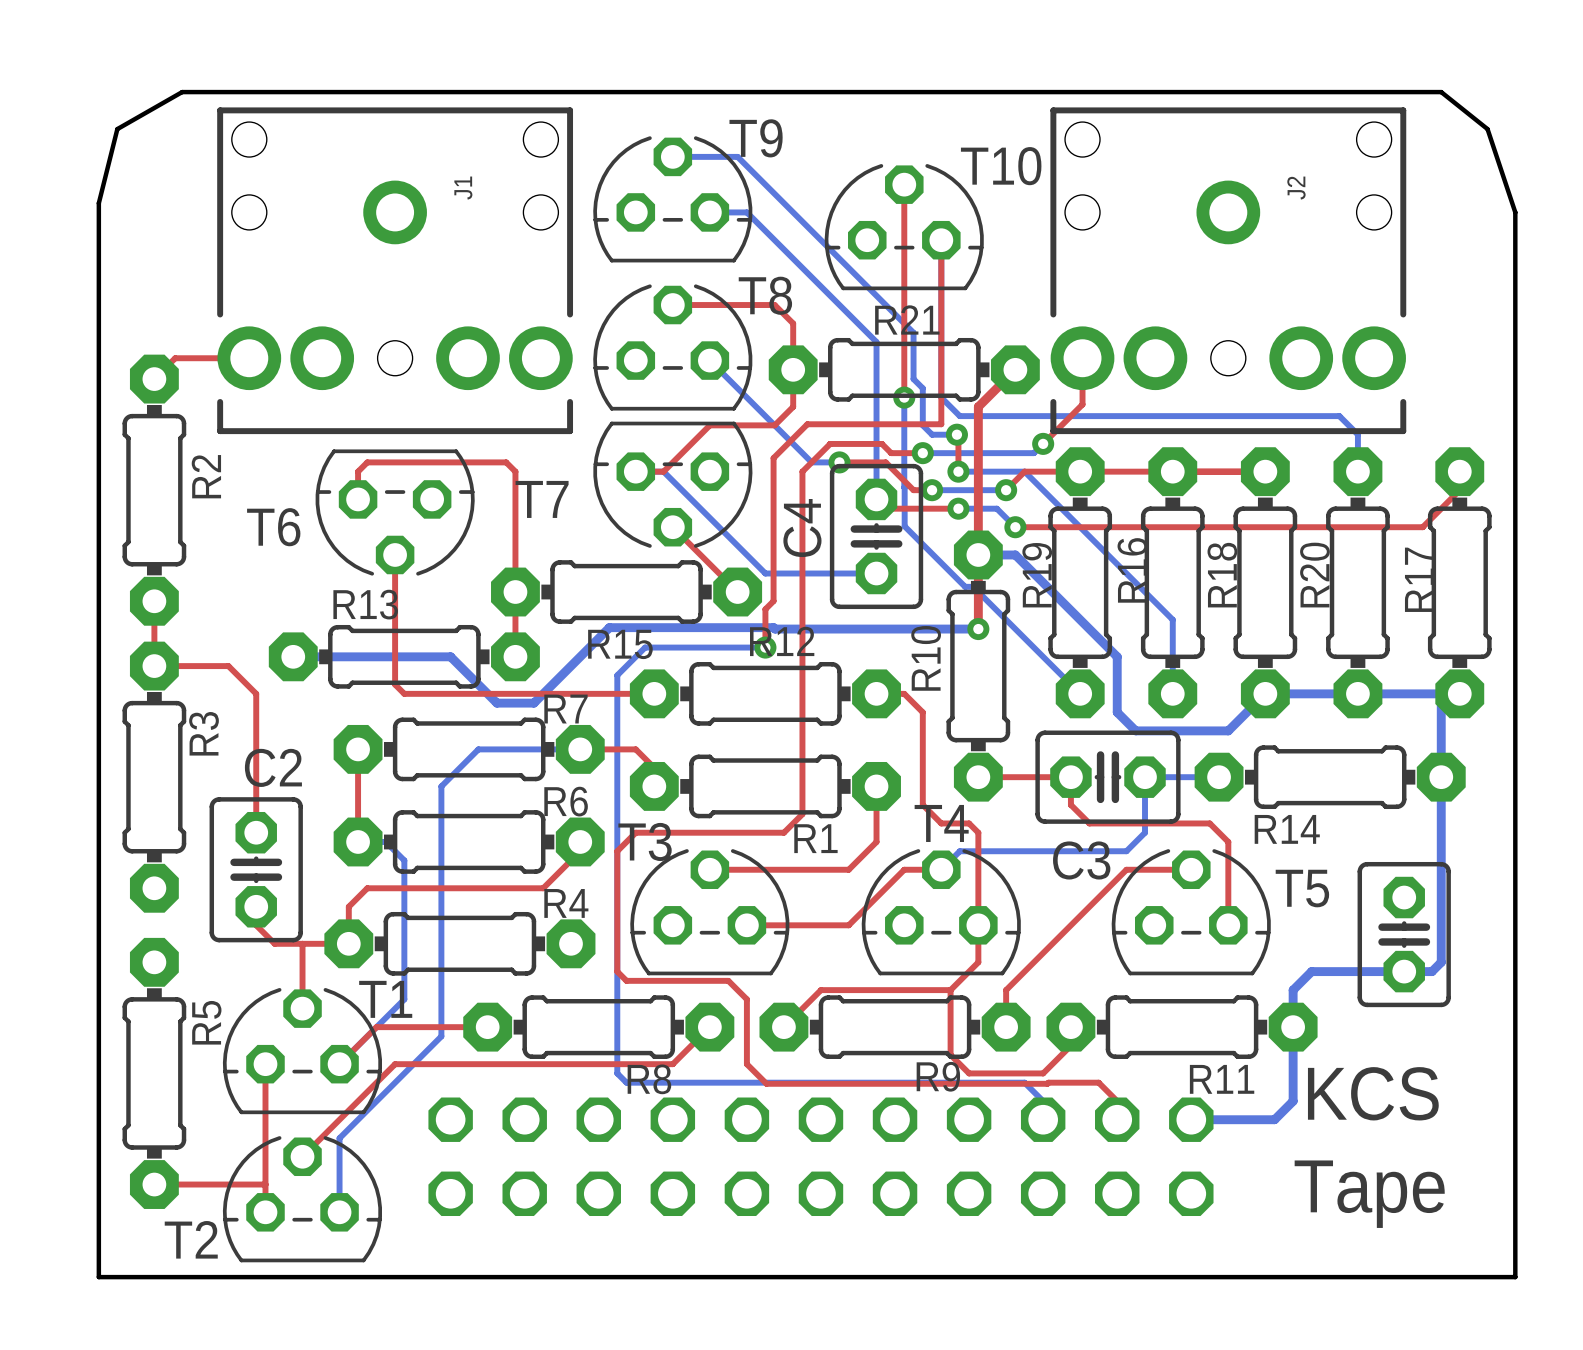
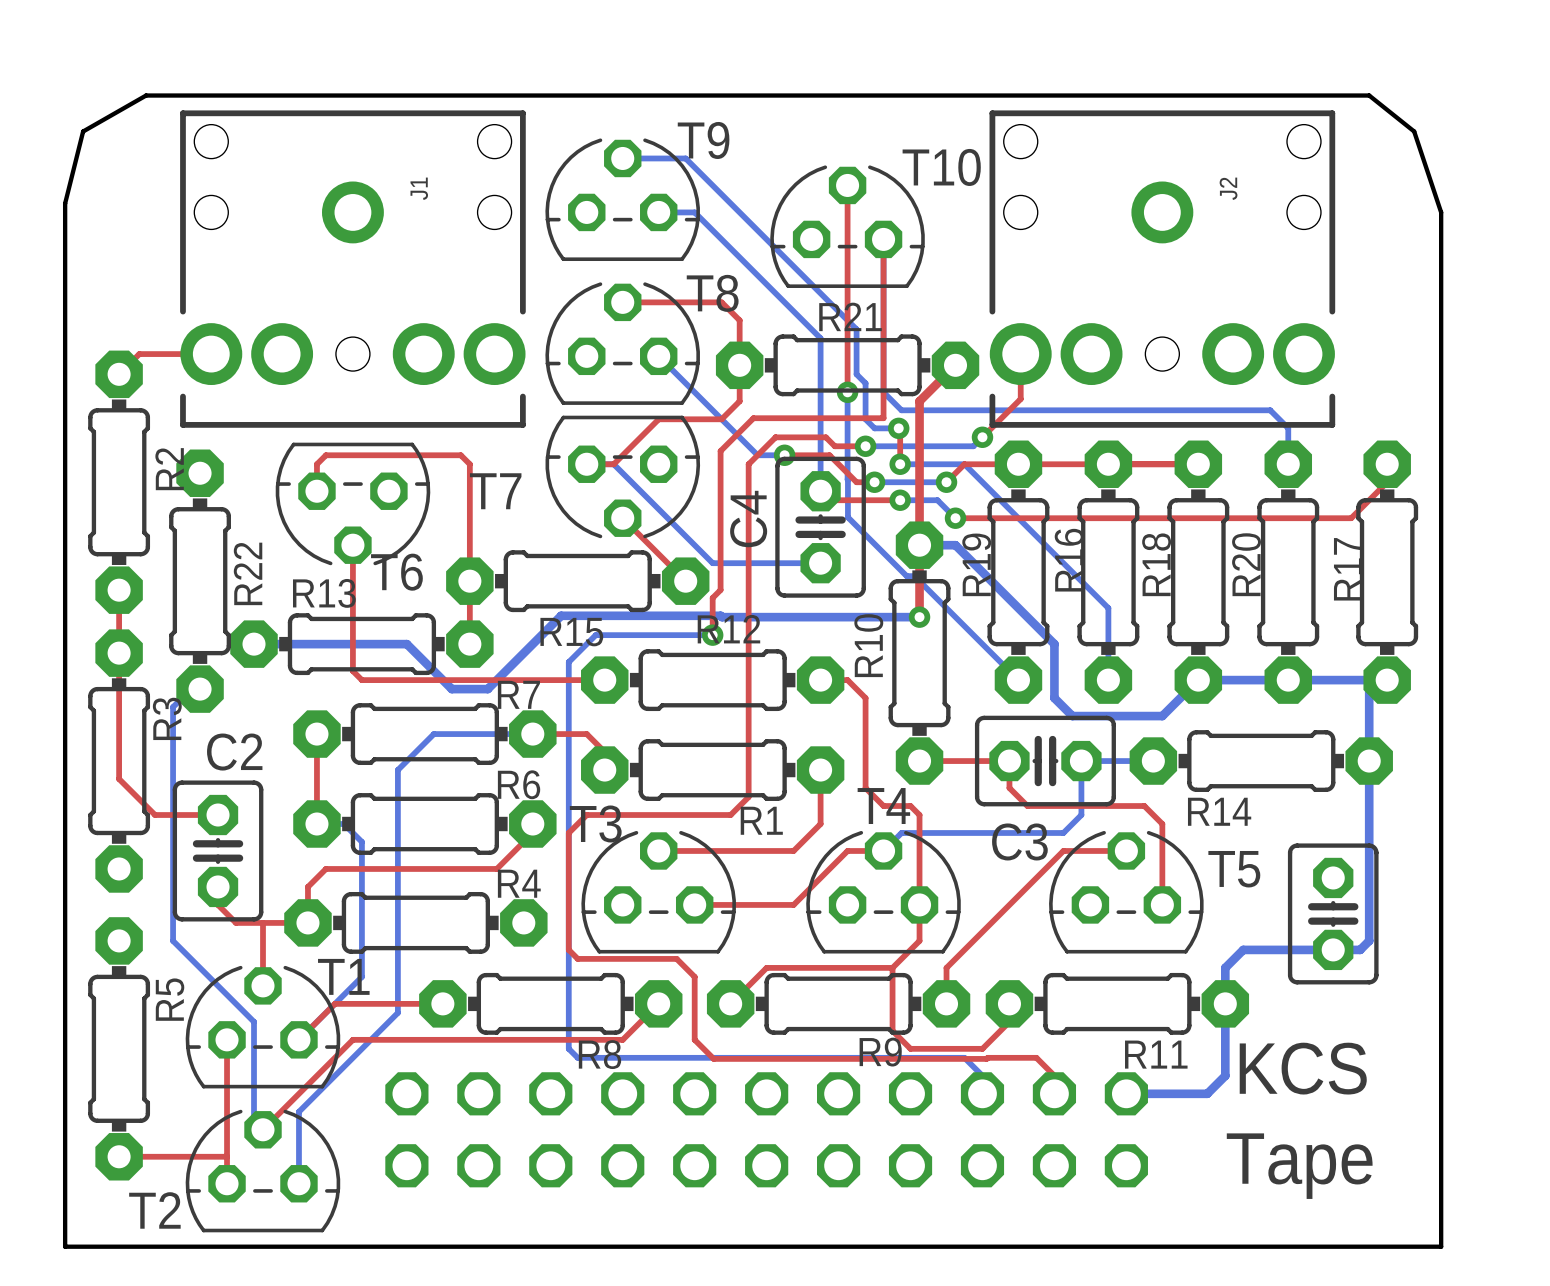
T6 name position: T6 (273, 527) -> T6 (396, 572)
R22: none -> (200, 581)
top track: (154, 666) (228, 666) (256, 693) (256, 832) -> (119, 653) (119, 779) (155, 815) (218, 815)
bottom track: none -> (200, 689) (191, 689) (173, 707) (173, 940) (254, 1021) (254, 1120) (263, 1129)

